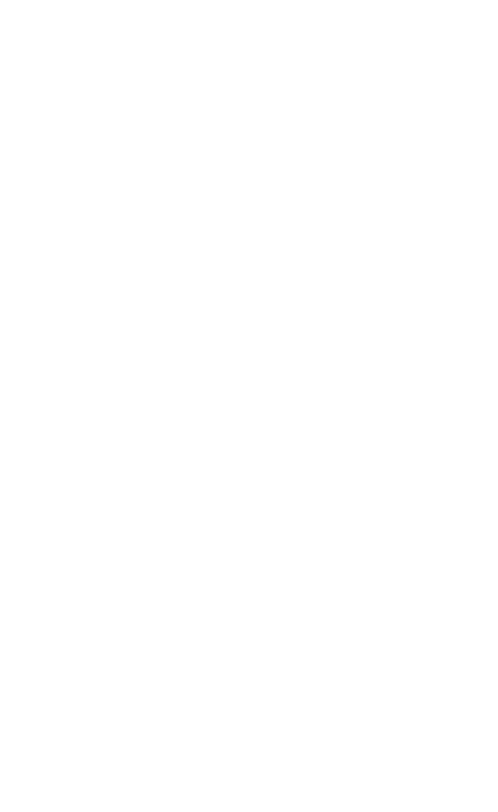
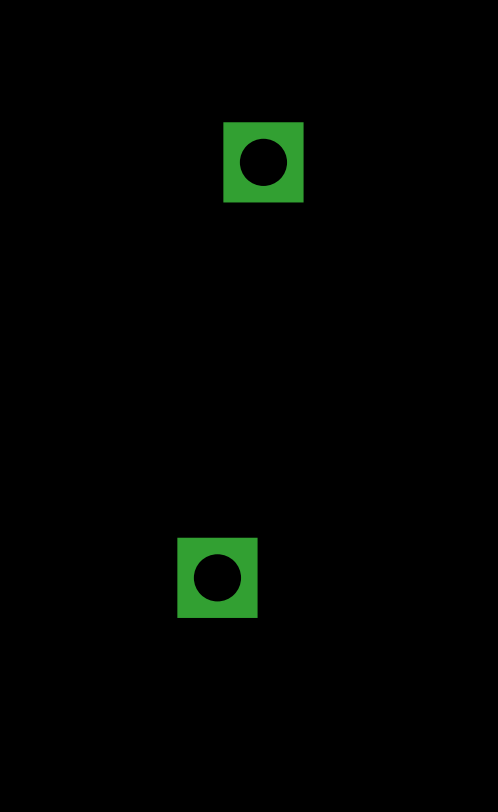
part: none -> (263, 162)
part: none -> (217, 577)

